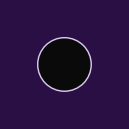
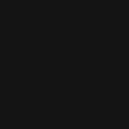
part: (64, 64) -> none

